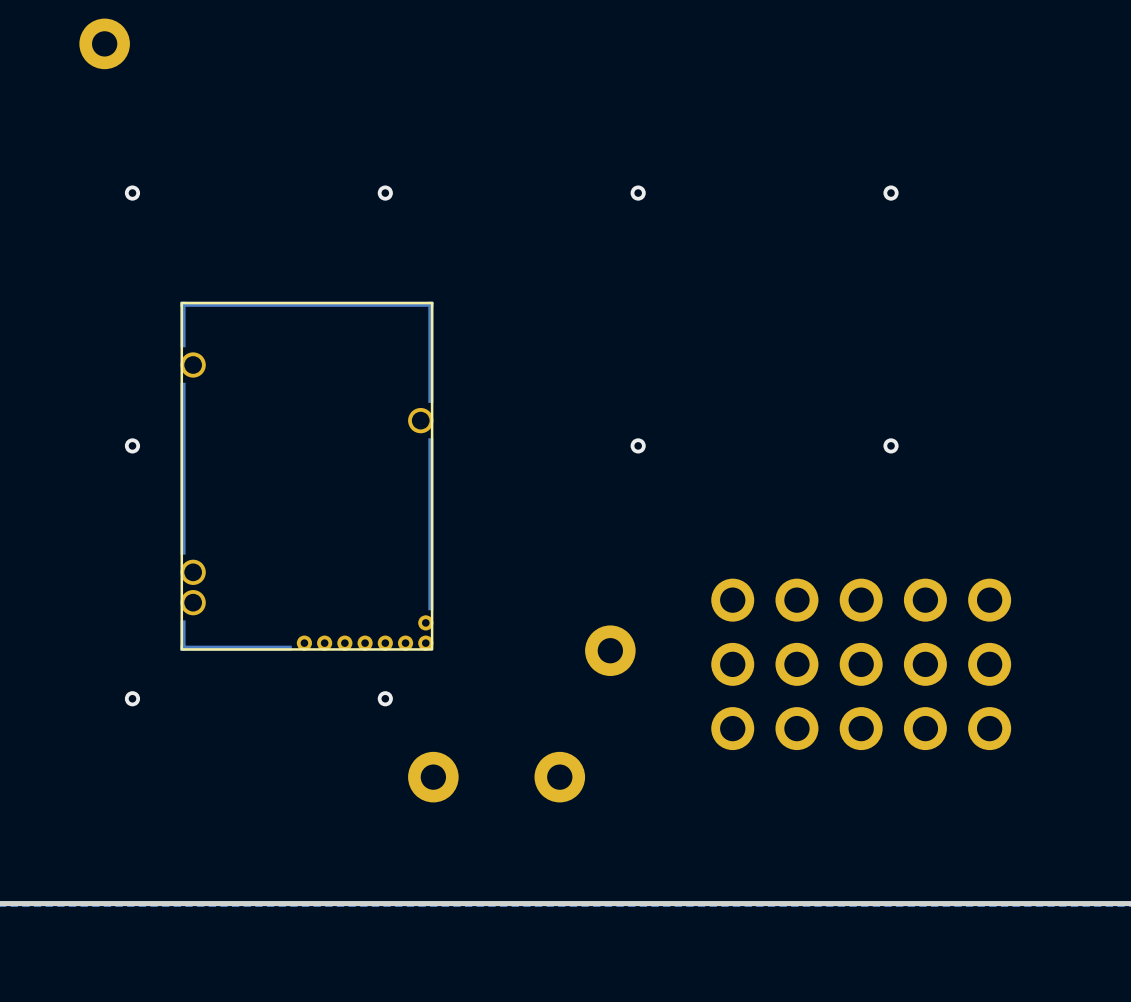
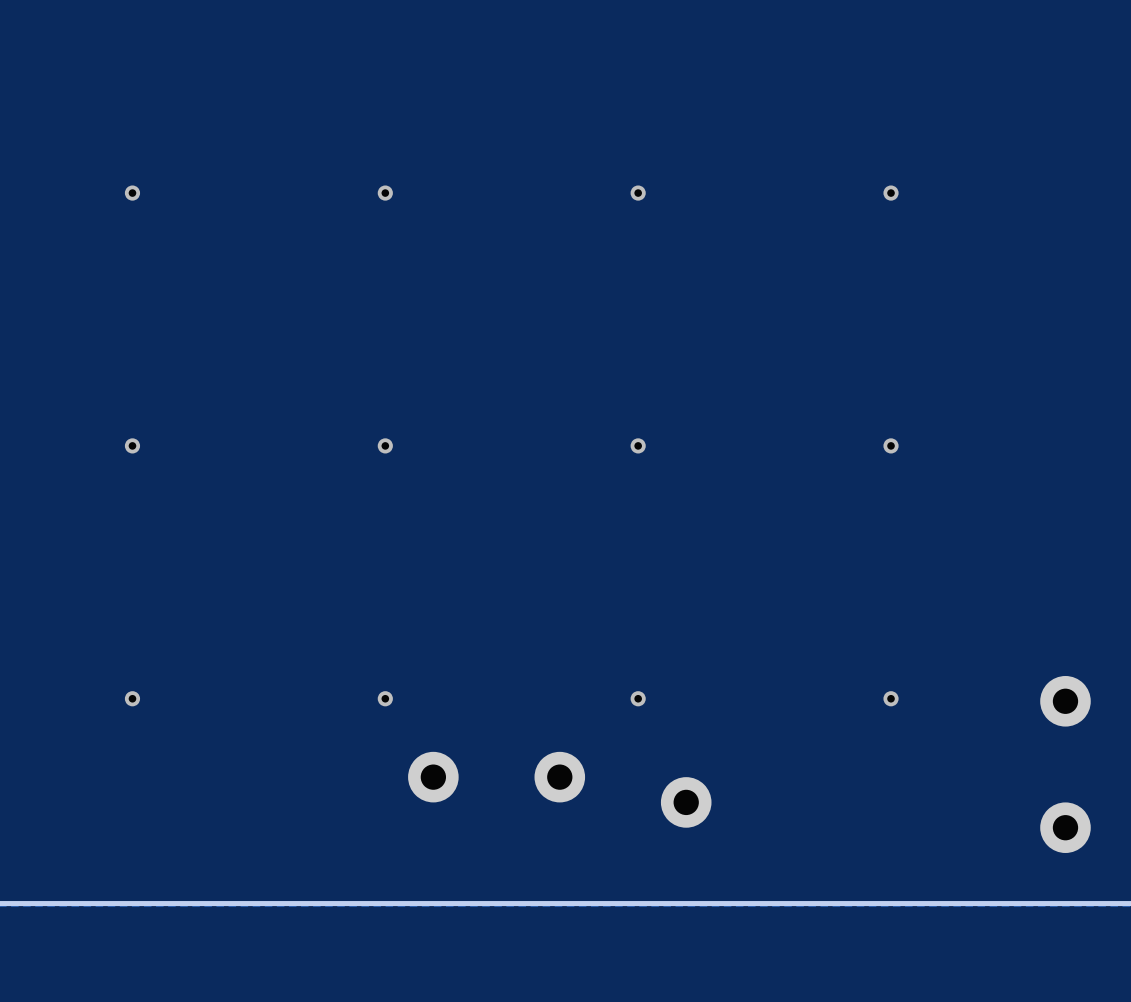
part: (104, 43) -> none
via: none -> (385, 445)
part: (306, 476) -> none
part position: (610, 650) -> (686, 802)
part: (861, 664) -> none
via: none -> (638, 698)
via: none -> (891, 698)
part: none -> (1065, 701)
part: none -> (1065, 827)

